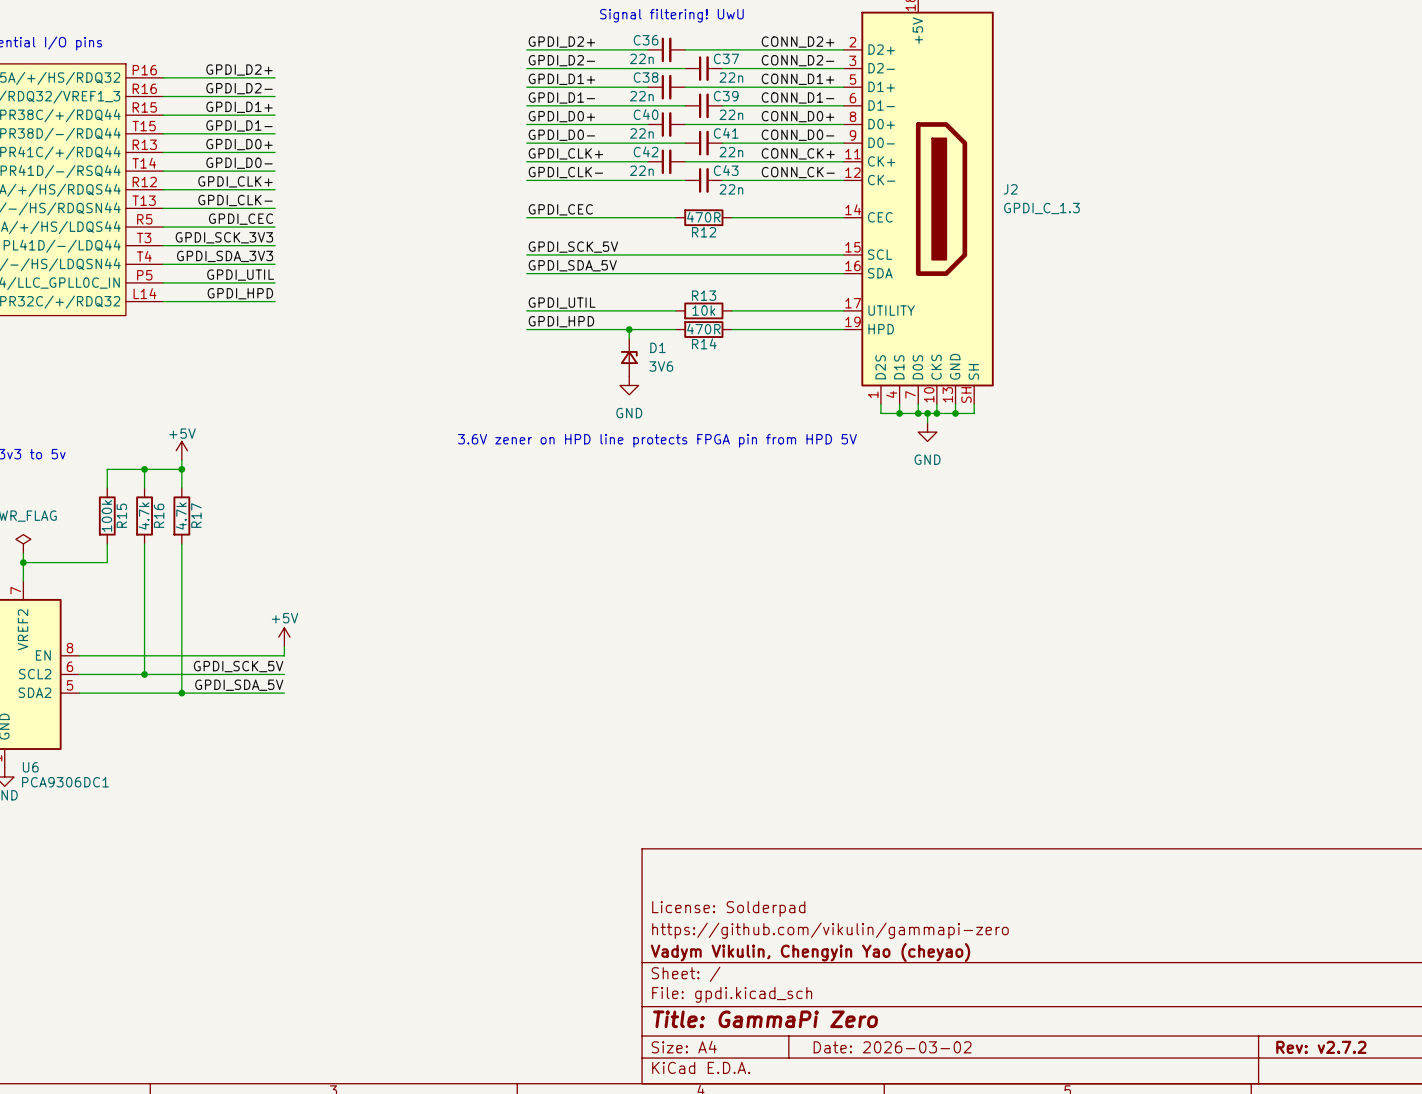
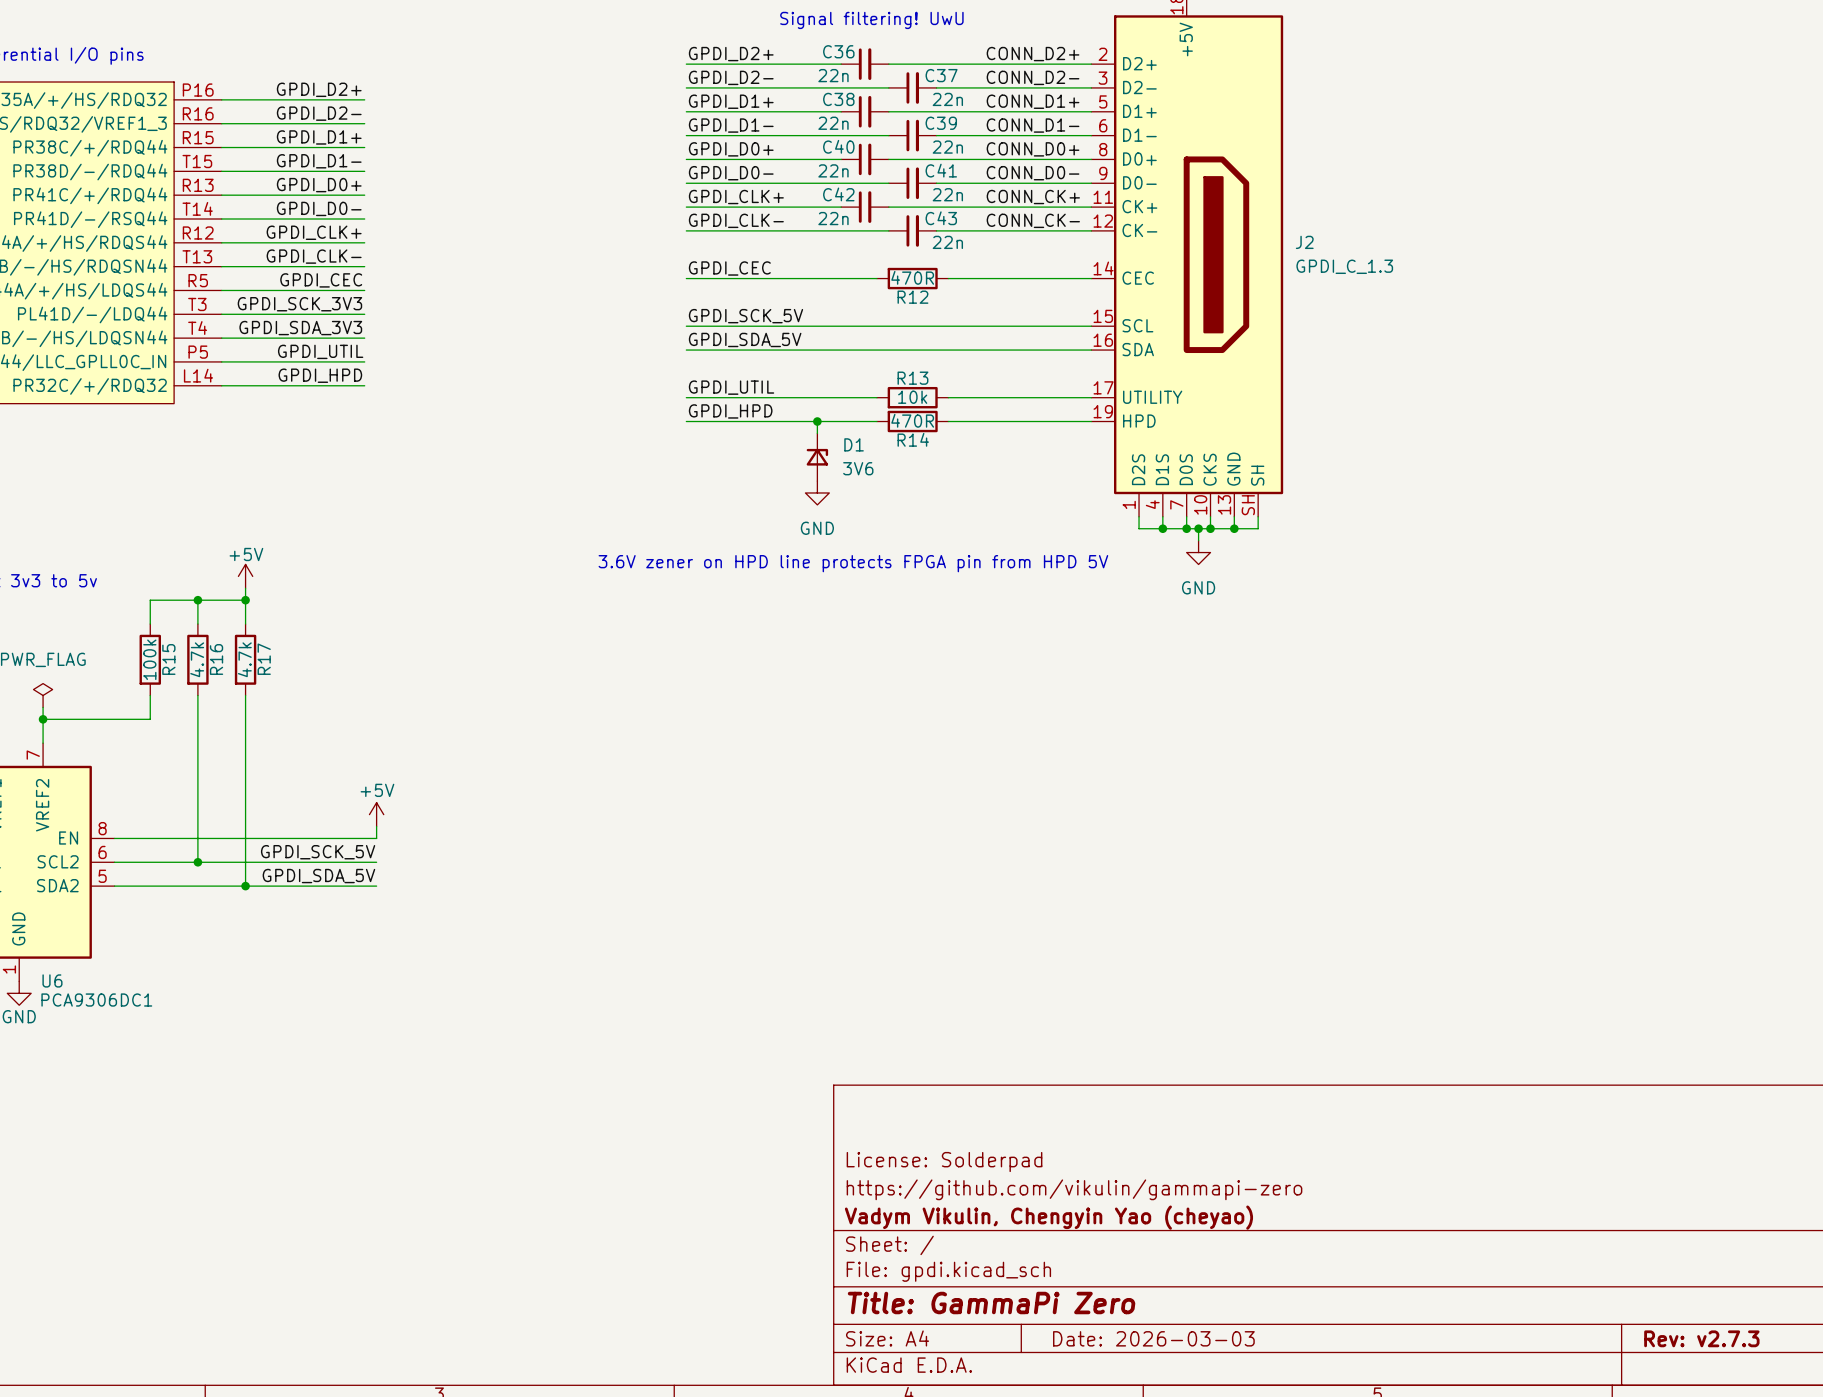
title block: Date: 2026-03-02 (892, 1047) -> Date: 2026-03-03 (1153, 1338)
title block: Rev: v2.7.2 (1321, 1047) -> Rev: v2.7.3 (1701, 1338)

